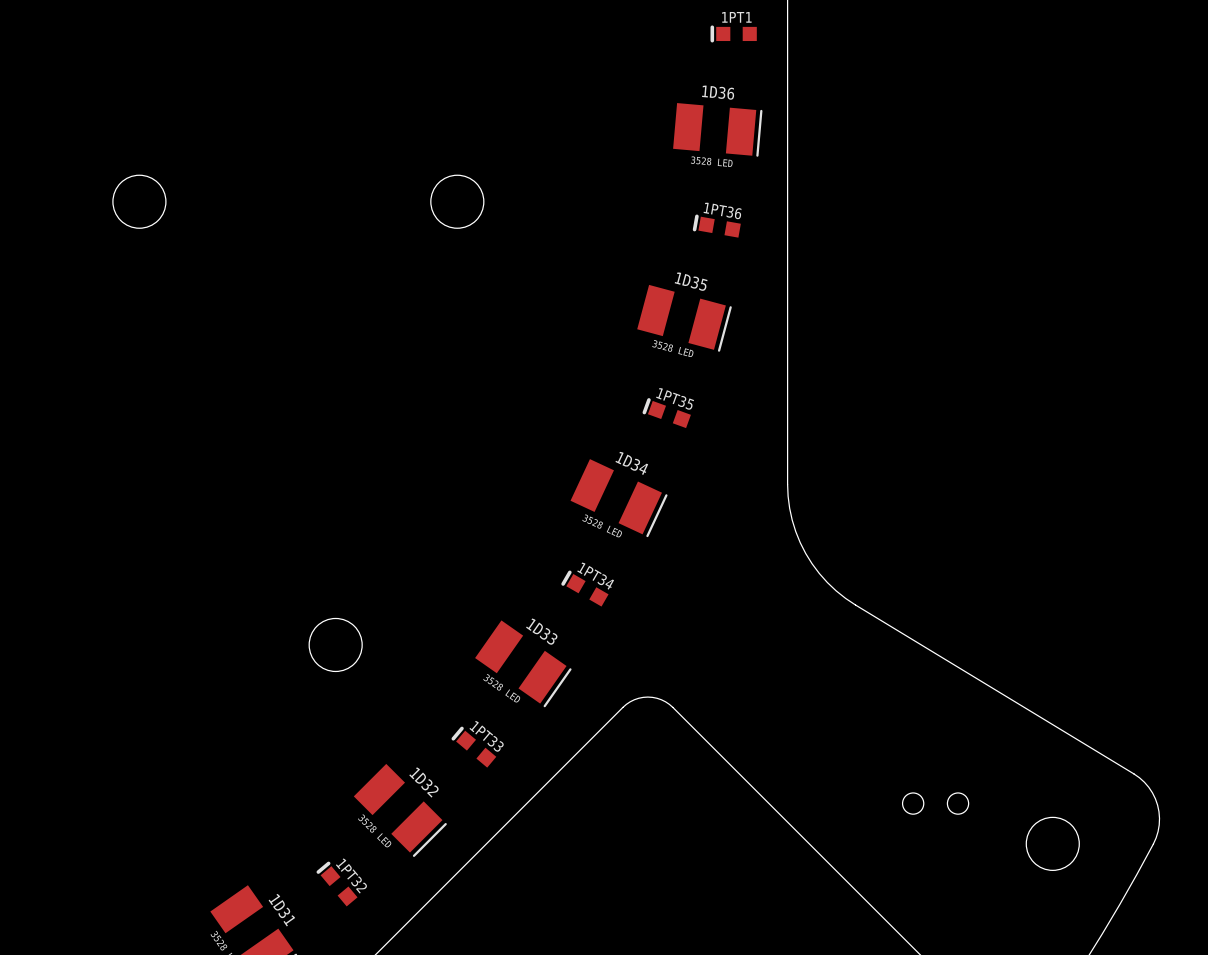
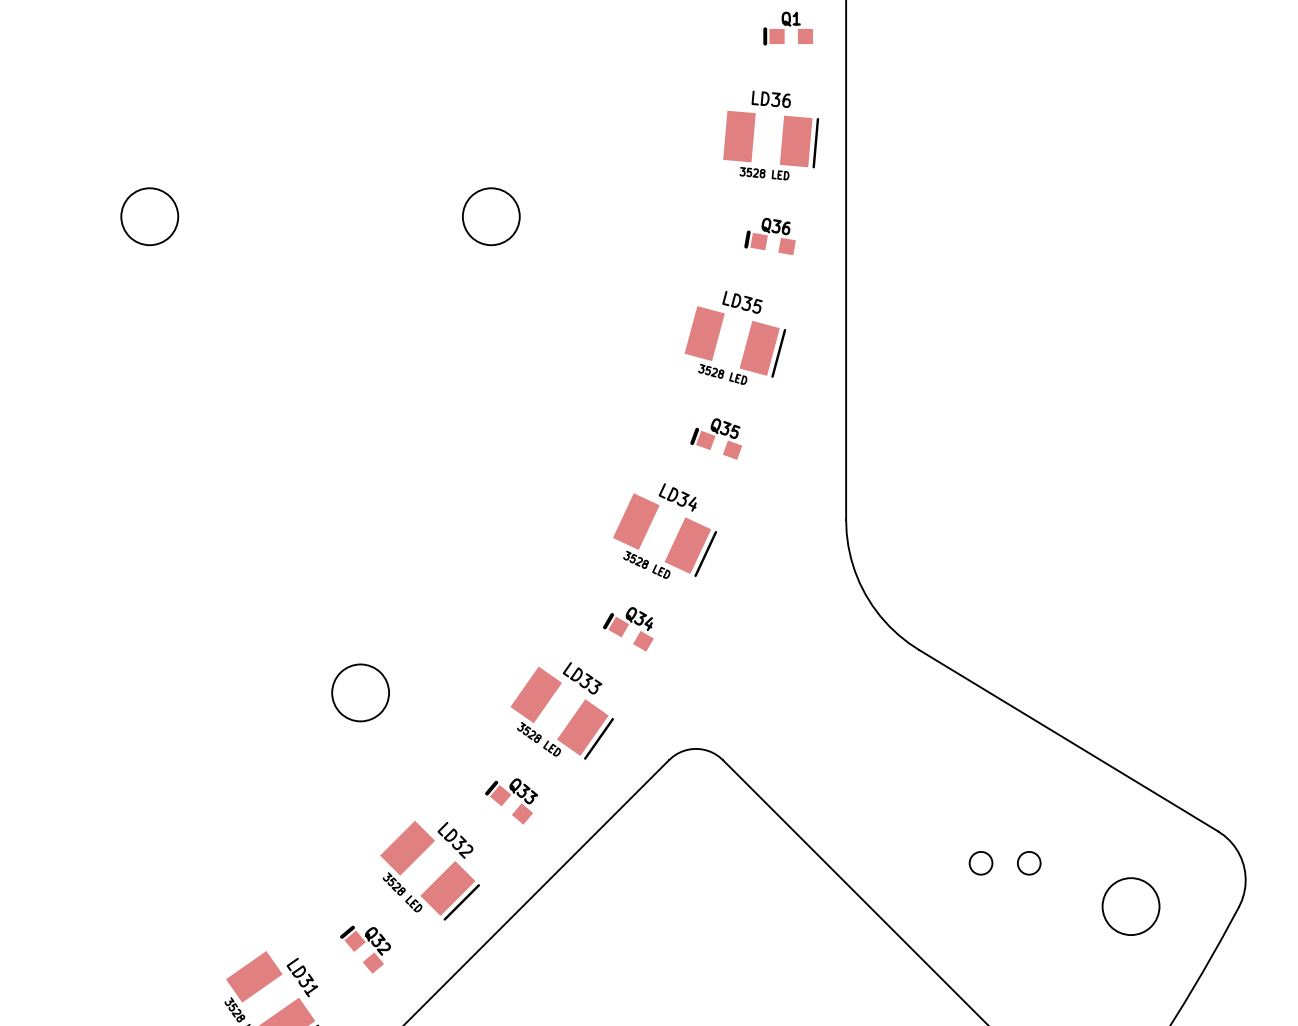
1PT1 name: 1PT1 (736, 17) -> Q1 (791, 19)
1D36 name: 1D36 (718, 92) -> LD36 (771, 99)
1PT36 name: 1PT36 (722, 211) -> Q36 (776, 226)
1D35 name: 1D35 (691, 281) -> LD35 (742, 302)
1PT35 name: 1PT35 (675, 399) -> Q35 (725, 428)
1D34 name: 1D34 (631, 463) -> LD34 (677, 497)
1PT34 name: 1PT34 (595, 576) -> Q34 (639, 619)
1D33 name: 1D33 (541, 631) -> LD33 (582, 678)
1PT33 name: 1PT33 (486, 736) -> Q33 (523, 791)
1D32 name: 1D32 (423, 782) -> LD32 (455, 840)
1PT32 name: 1PT32 (351, 875) -> Q32 (378, 941)
1D31 name: 1D31 (281, 910) -> LD31 (302, 977)

